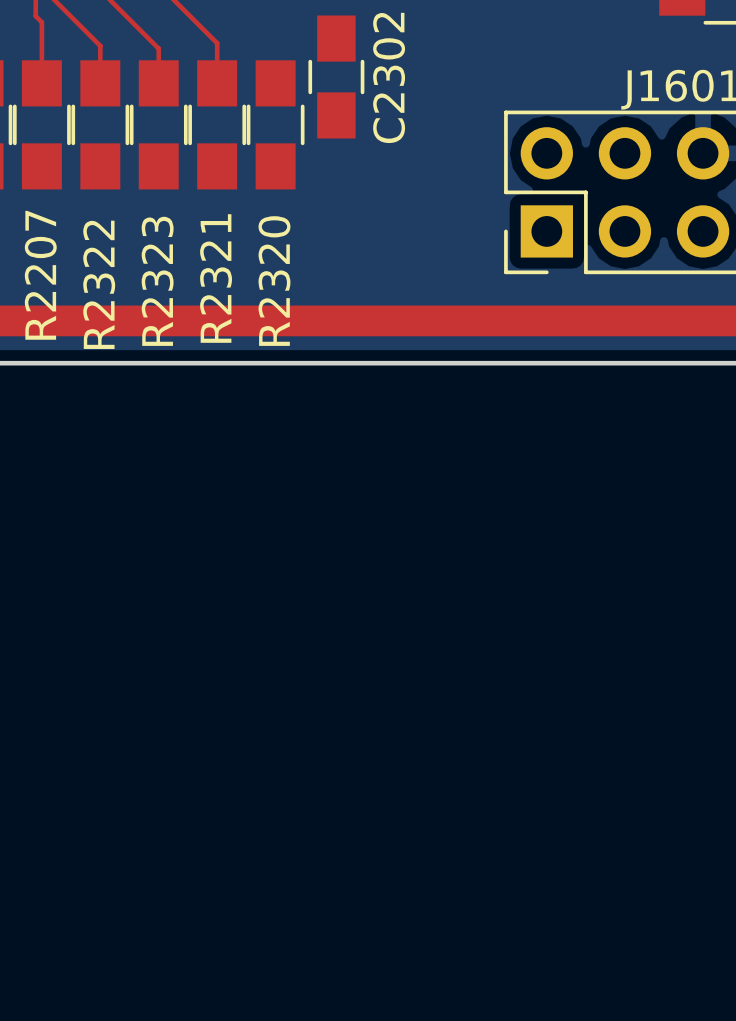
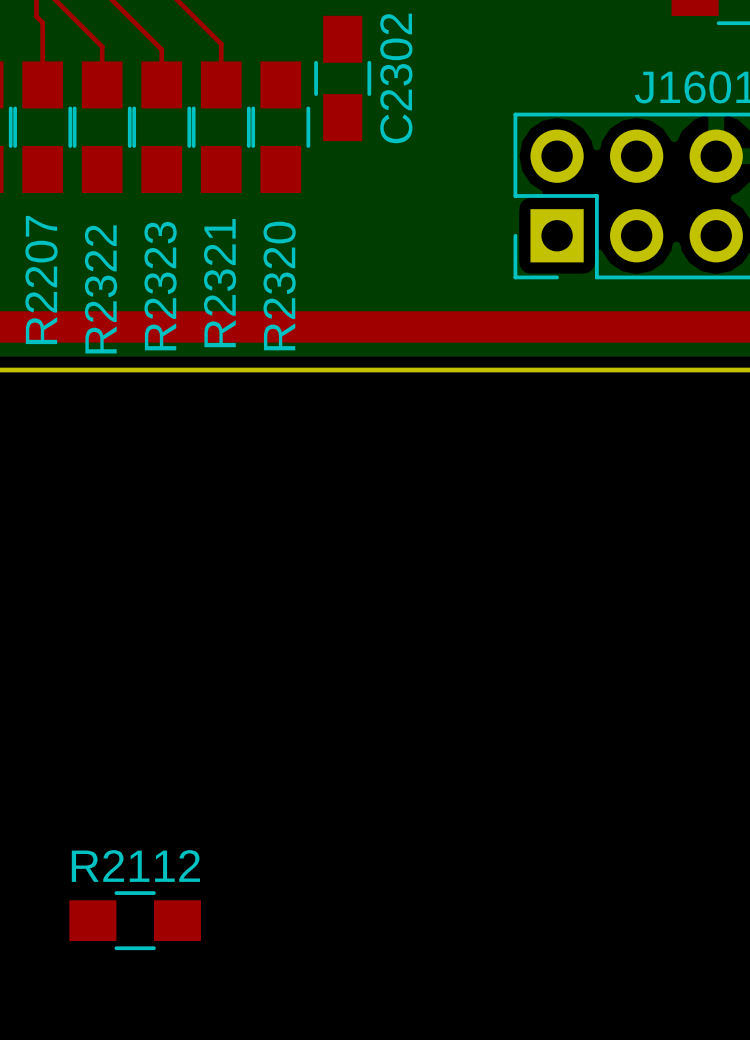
R2112: none -> (135, 920)

